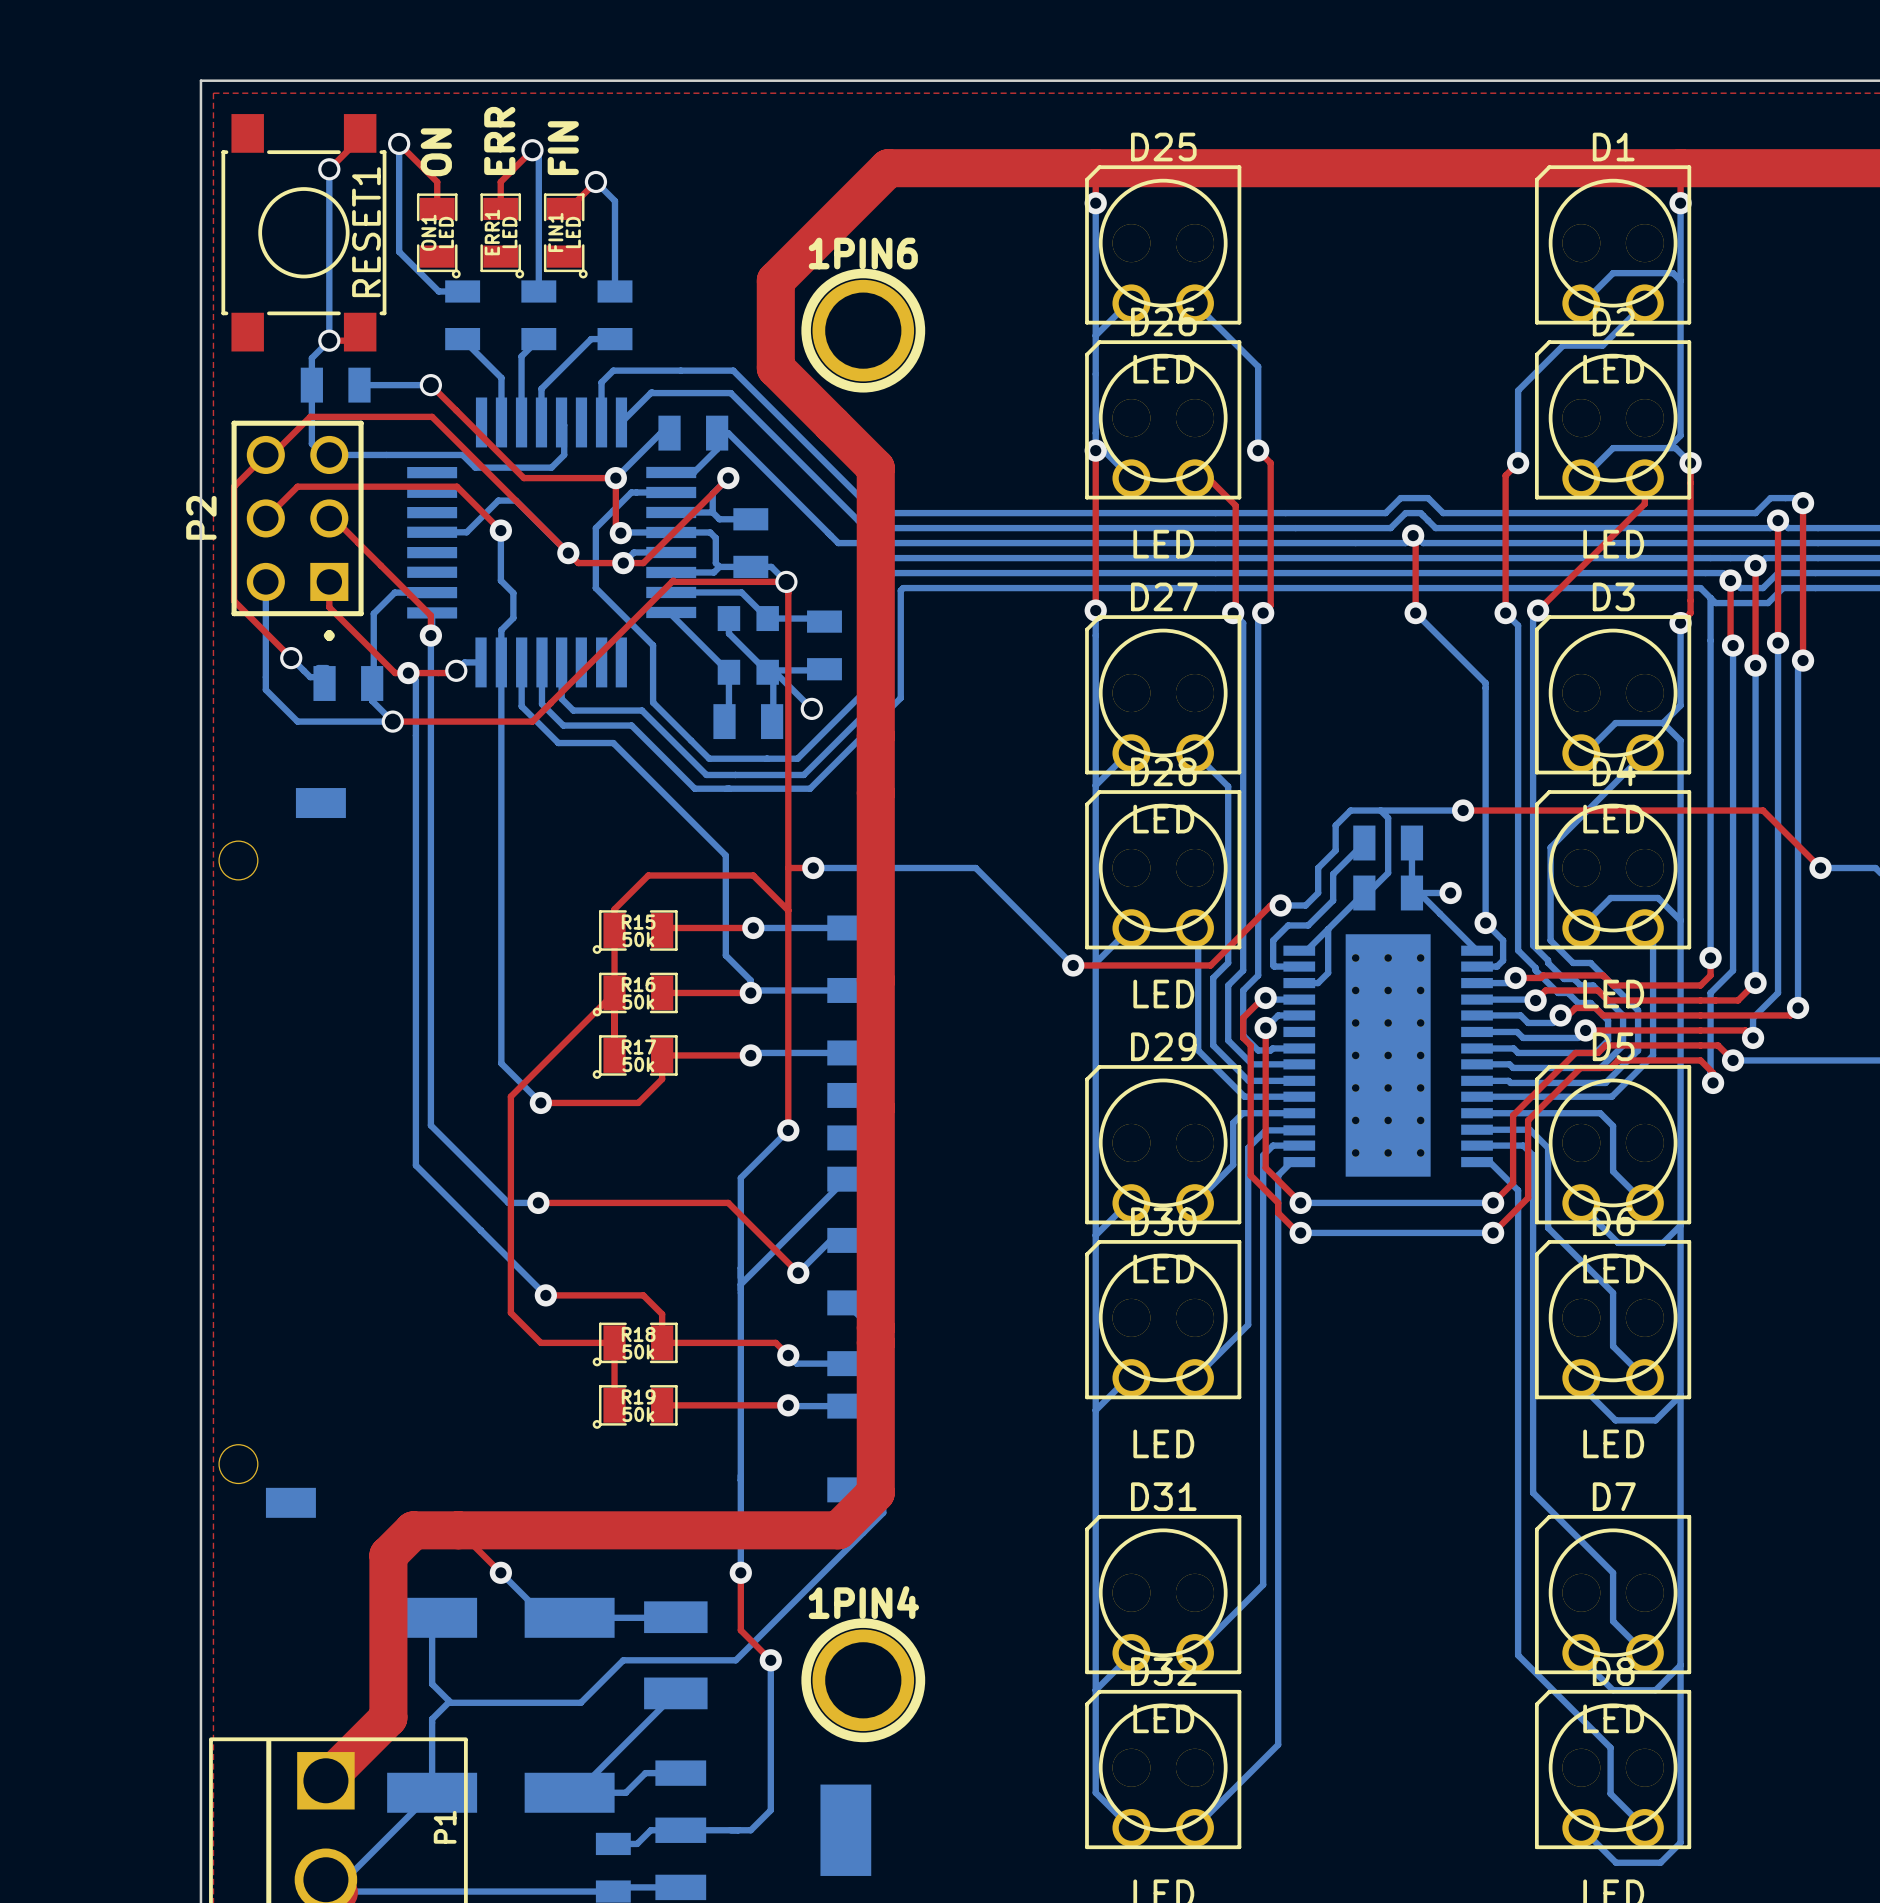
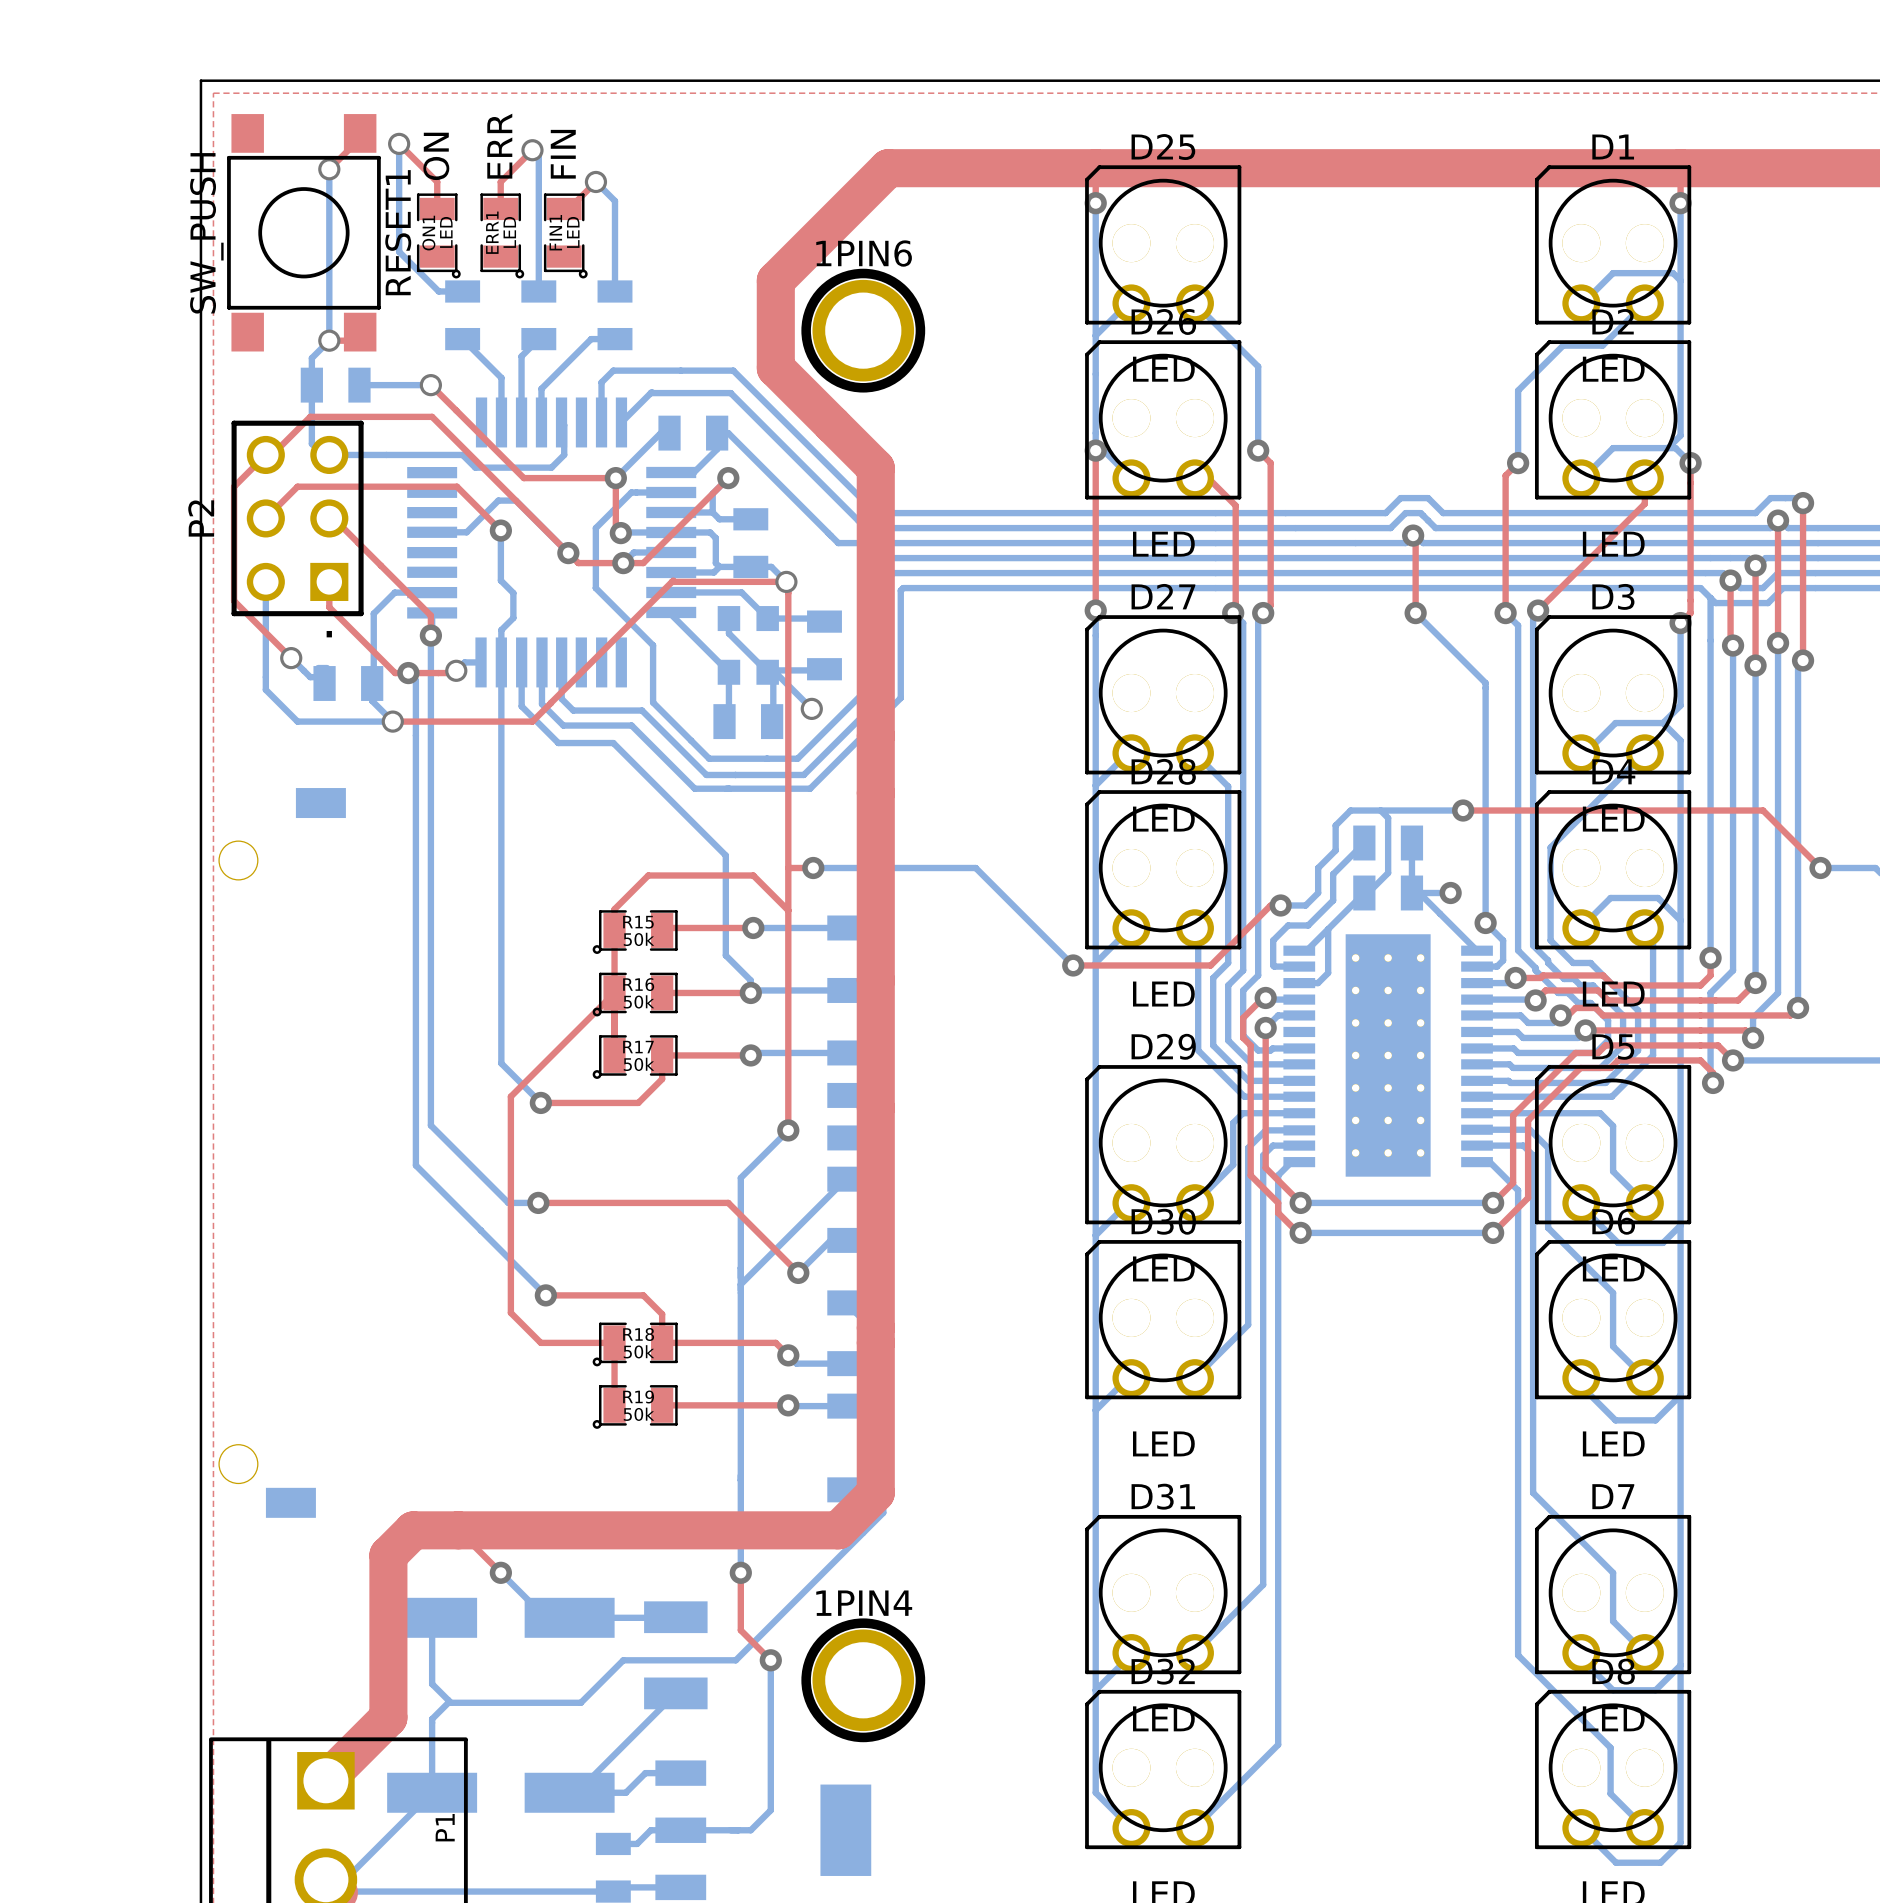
RESET1 footprint: [221, 114, 387, 352] -> [227, 114, 381, 352]
RESET1 name position: RESET1 (366, 232) -> RESET1 (398, 232)
RESET1 value: none -> SW_PUSH (206, 233)

